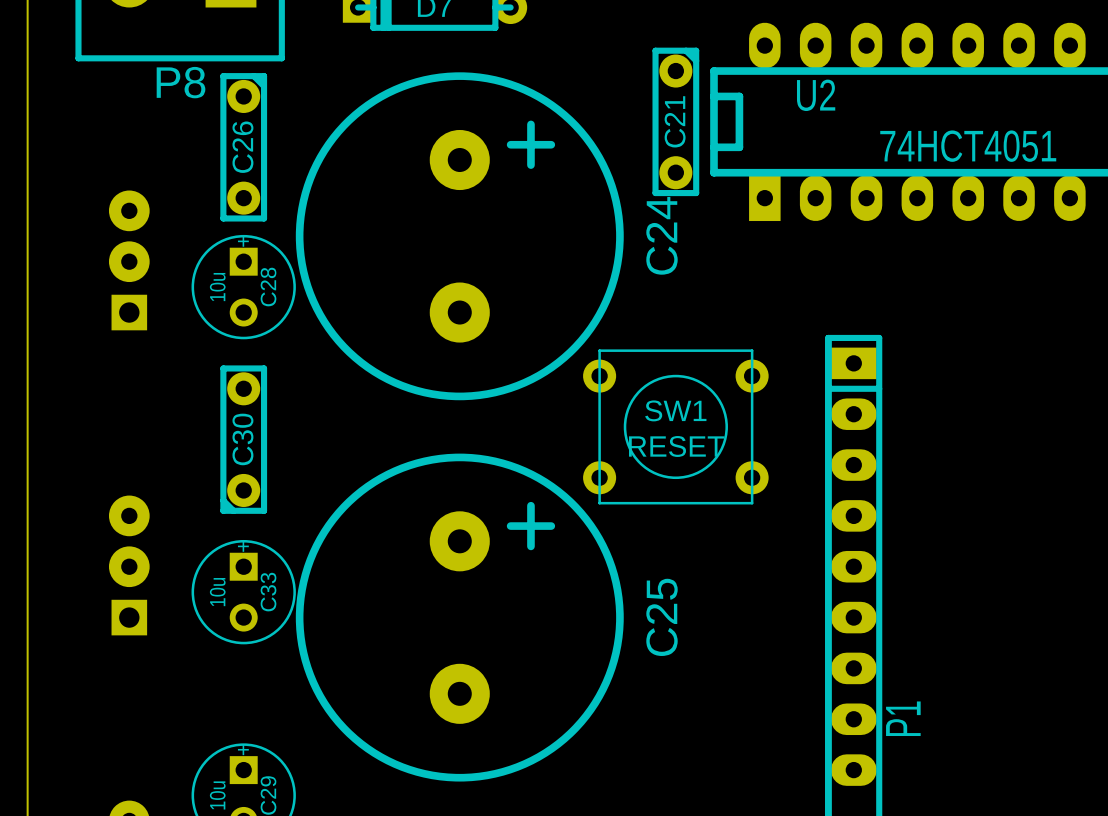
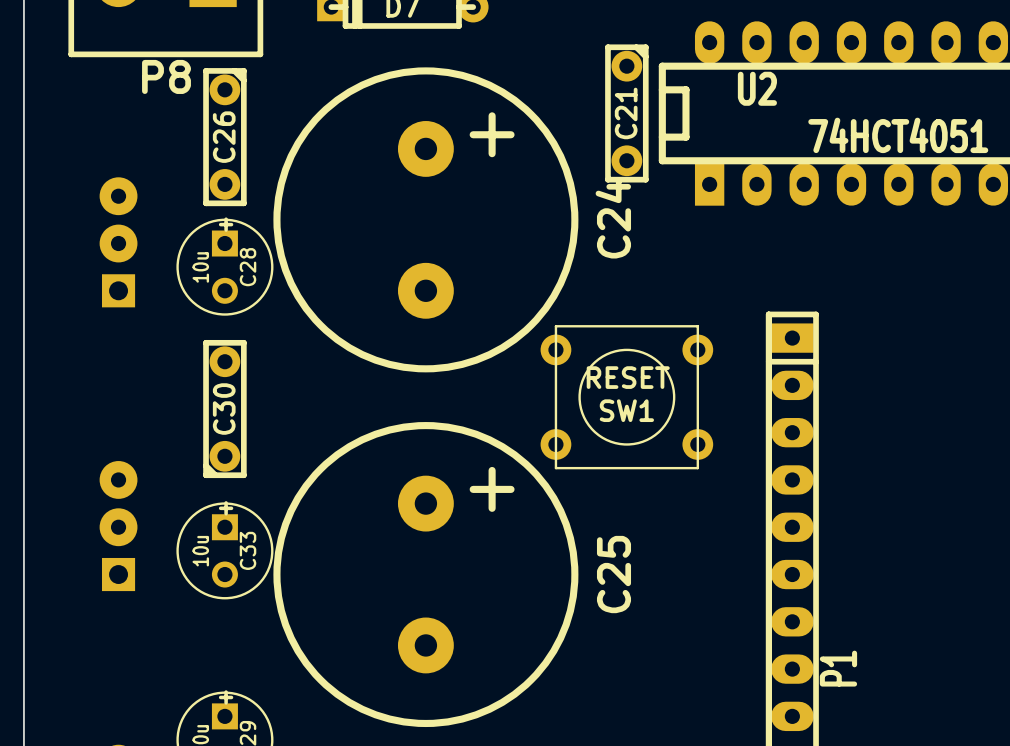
SW1 name position: SW1 (675, 410) -> SW1 (626, 410)
SW1 value position: RESET (676, 446) -> RESET (628, 377)

